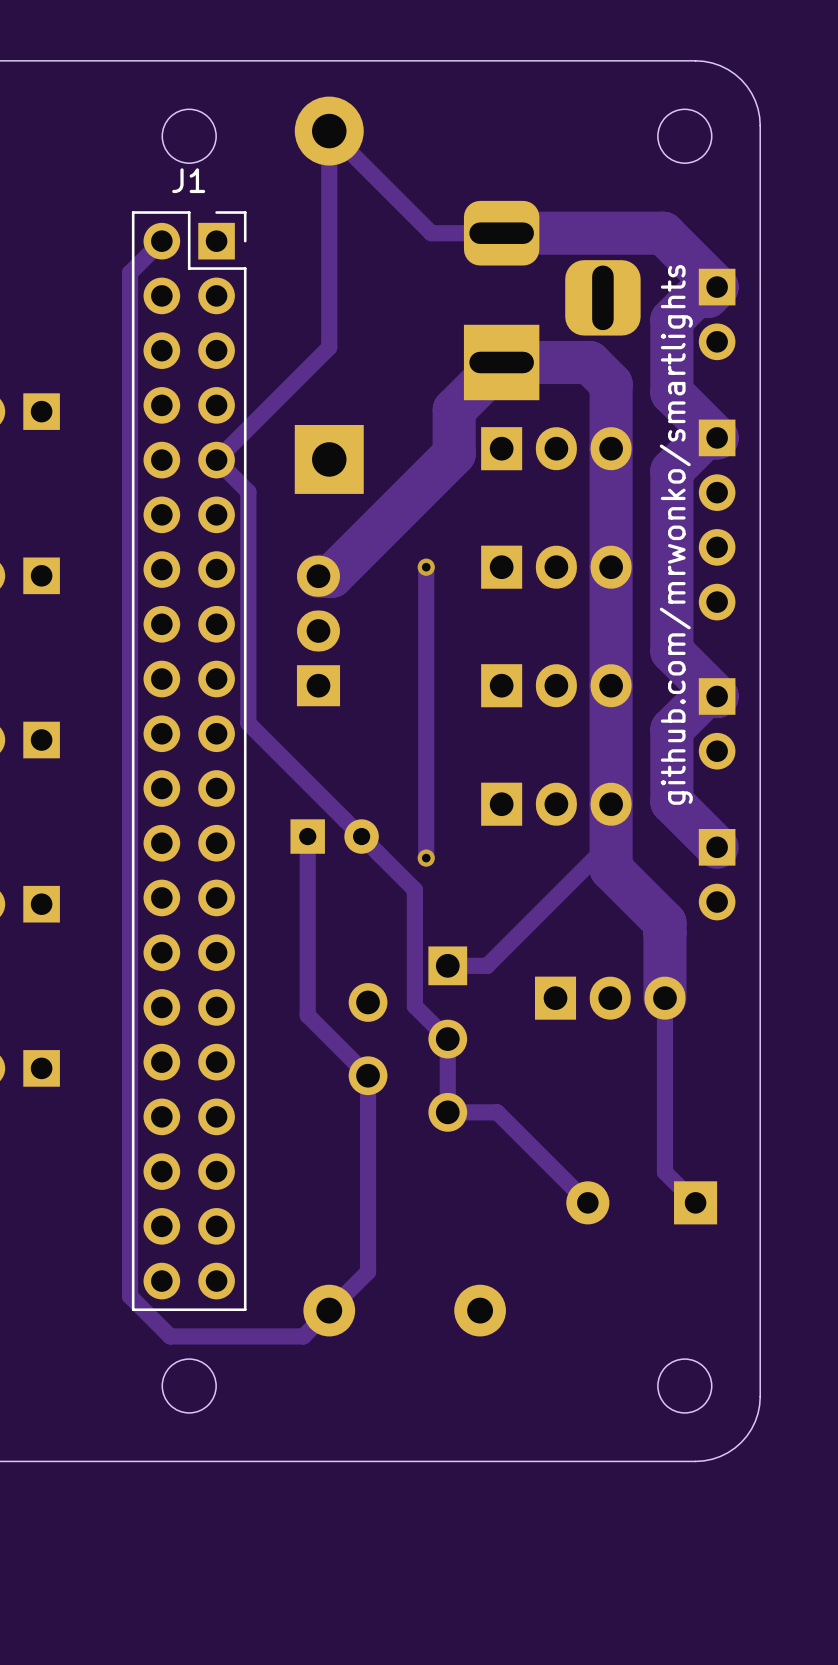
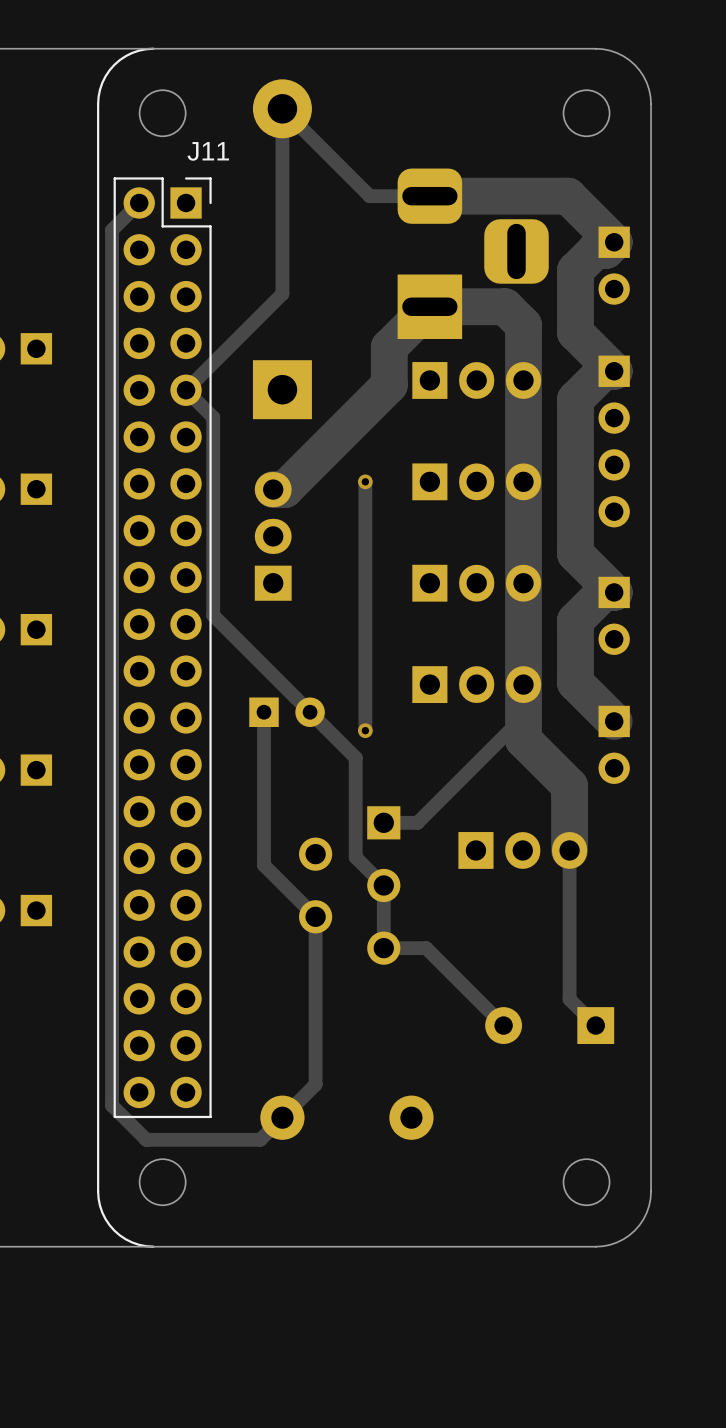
line: none -> (153, 48) (132, 52) (114, 64) (102, 82) (98, 104) (98, 1191) (102, 1212) (114, 1230) (132, 1242) (153, 1246)
J1 name: J1 (188, 180) -> J11 (208, 151)
text: github.com/mrwonko/smartlights (676, 534) -> none

